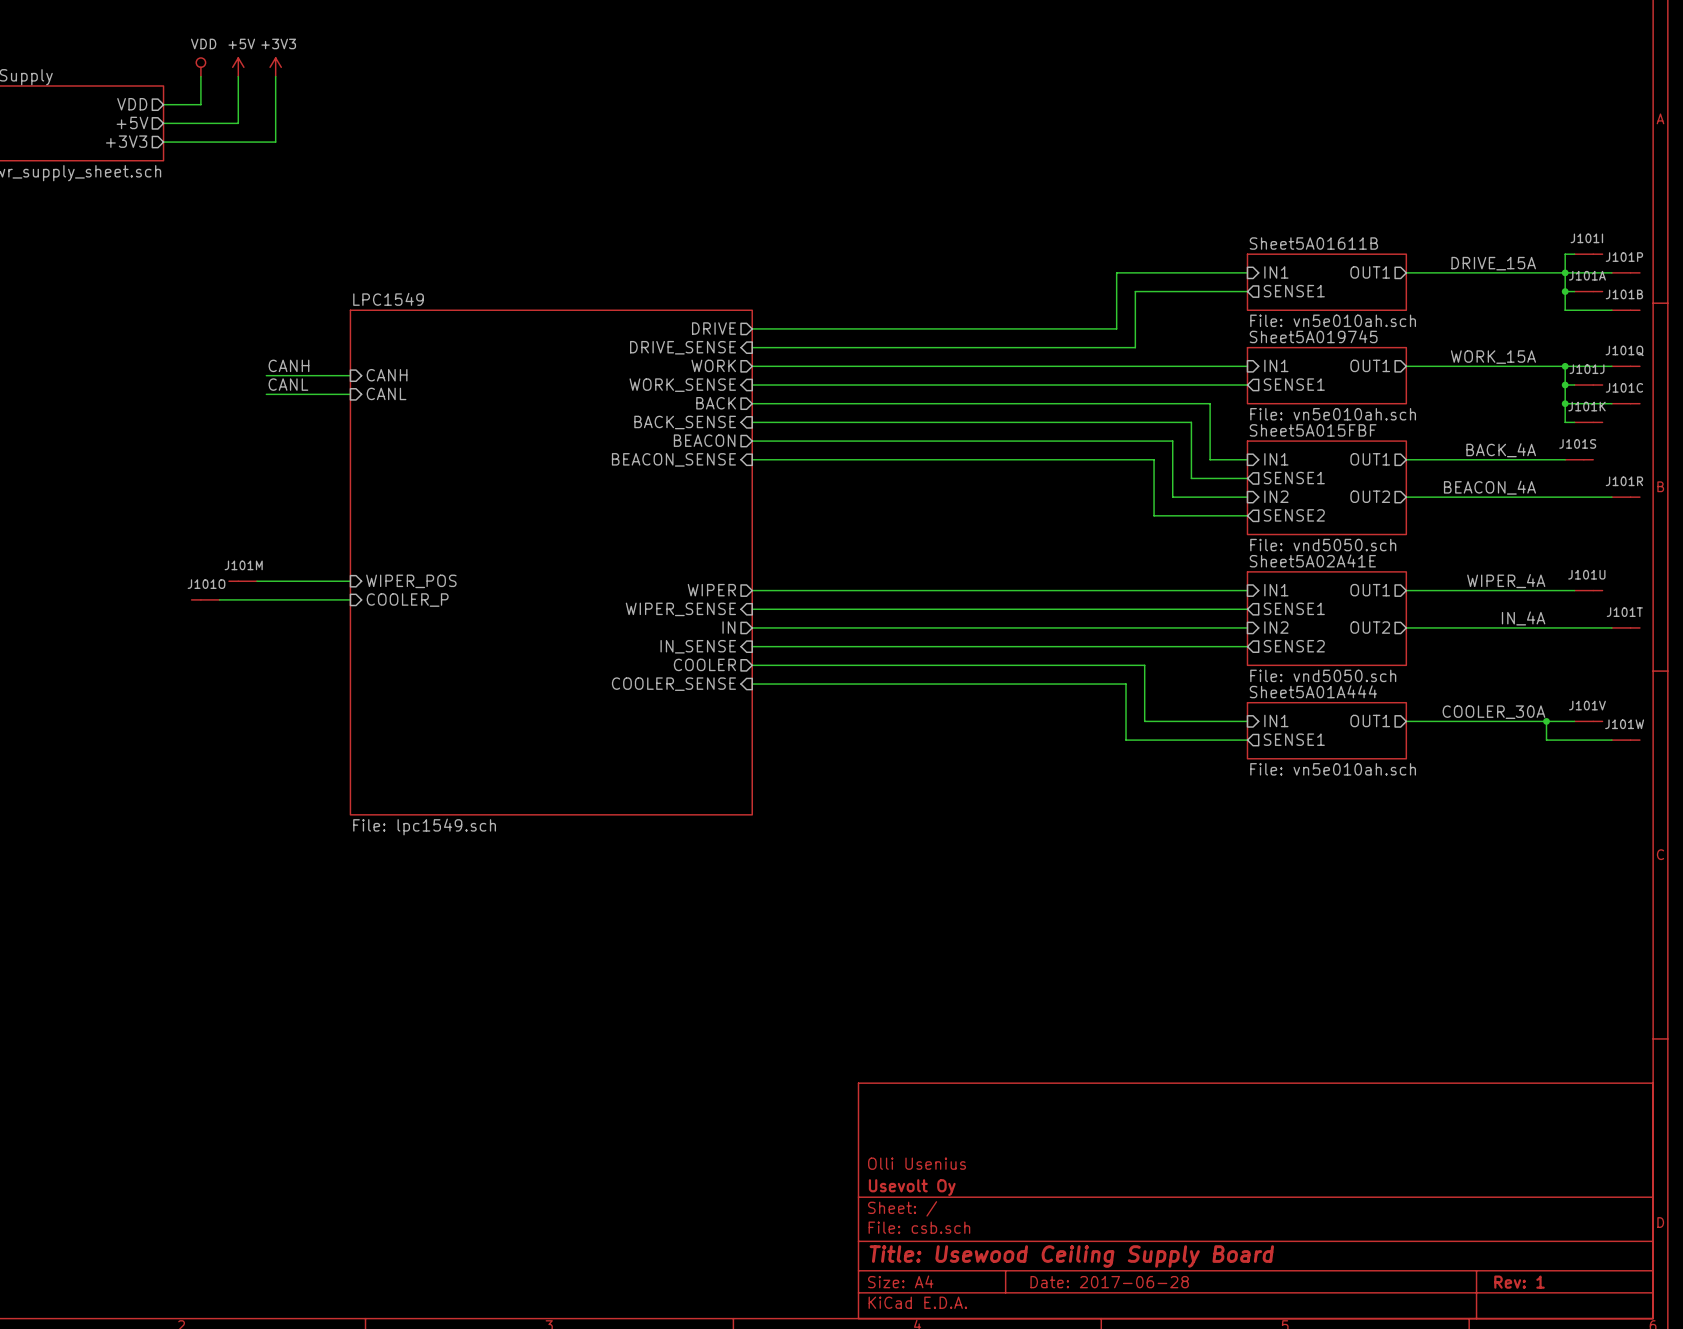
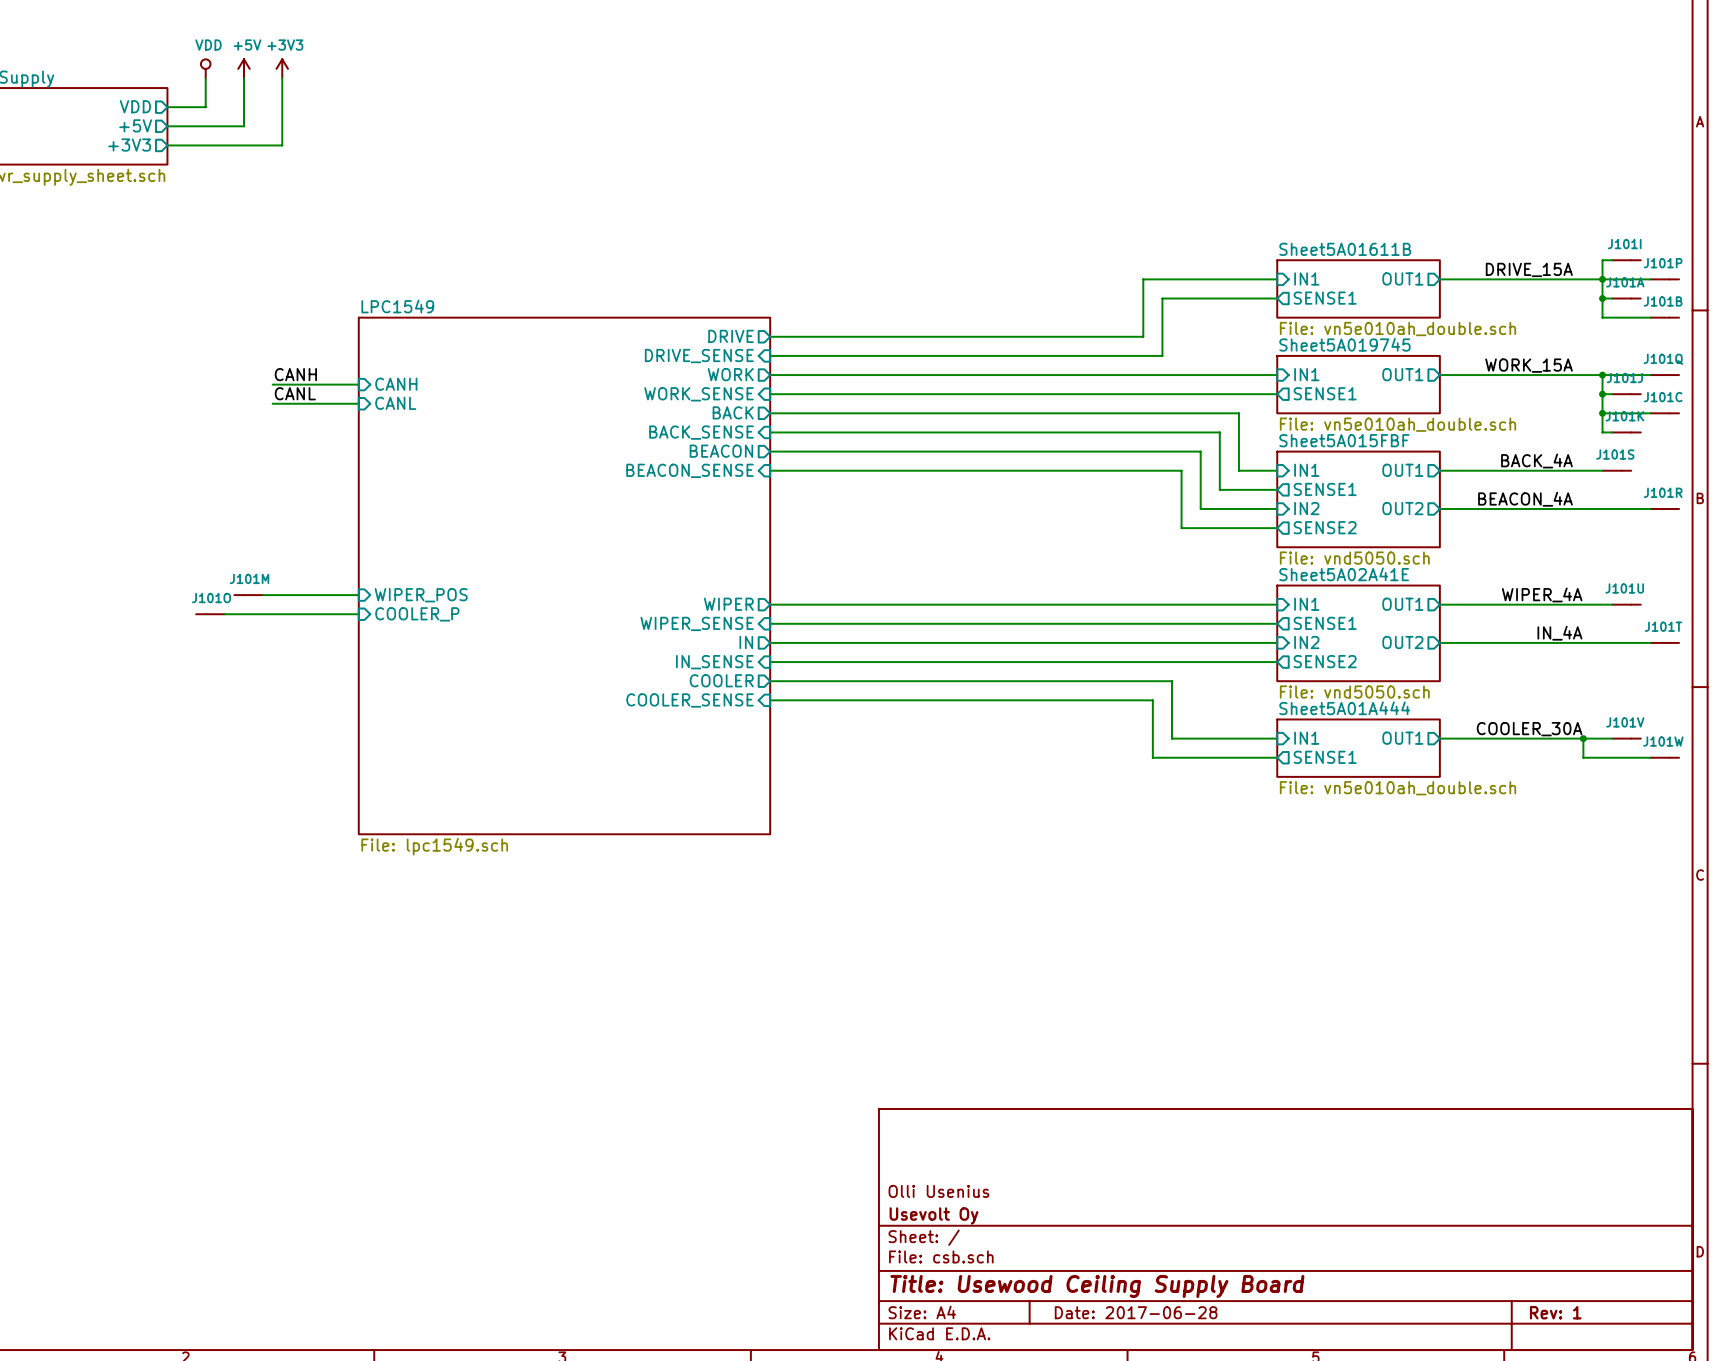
sheet Sheet5A01611B value: File: vn5e010ah.sch (1333, 320) -> File: vn5e010ah_double.sch (1397, 329)
sheet Sheet5A019745 value: File: vn5e010ah.sch (1333, 414) -> File: vn5e010ah_double.sch (1397, 424)
sheet Sheet5A01A444 value: File: vn5e010ah.sch (1333, 769) -> File: vn5e010ah_double.sch (1397, 788)

